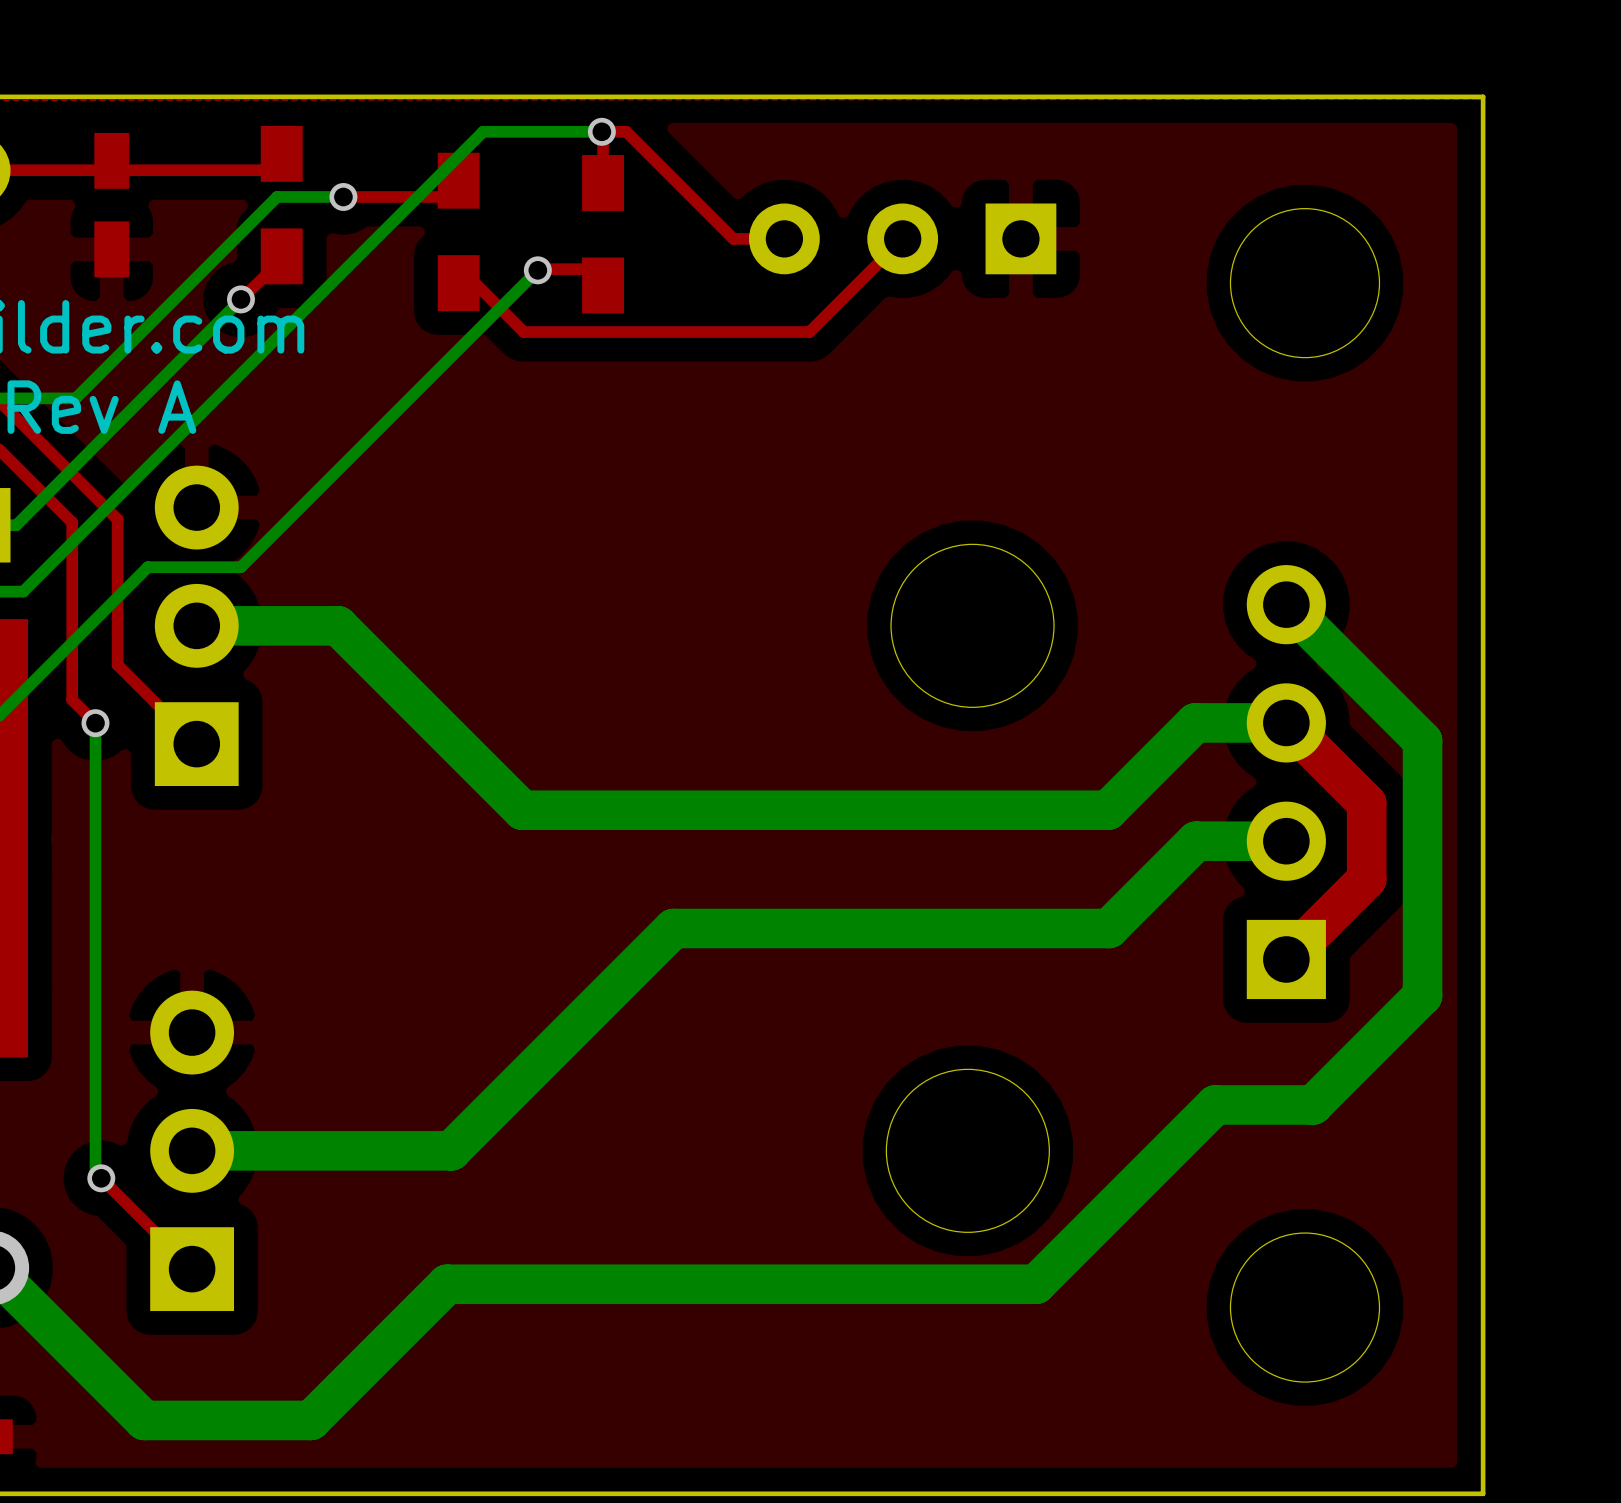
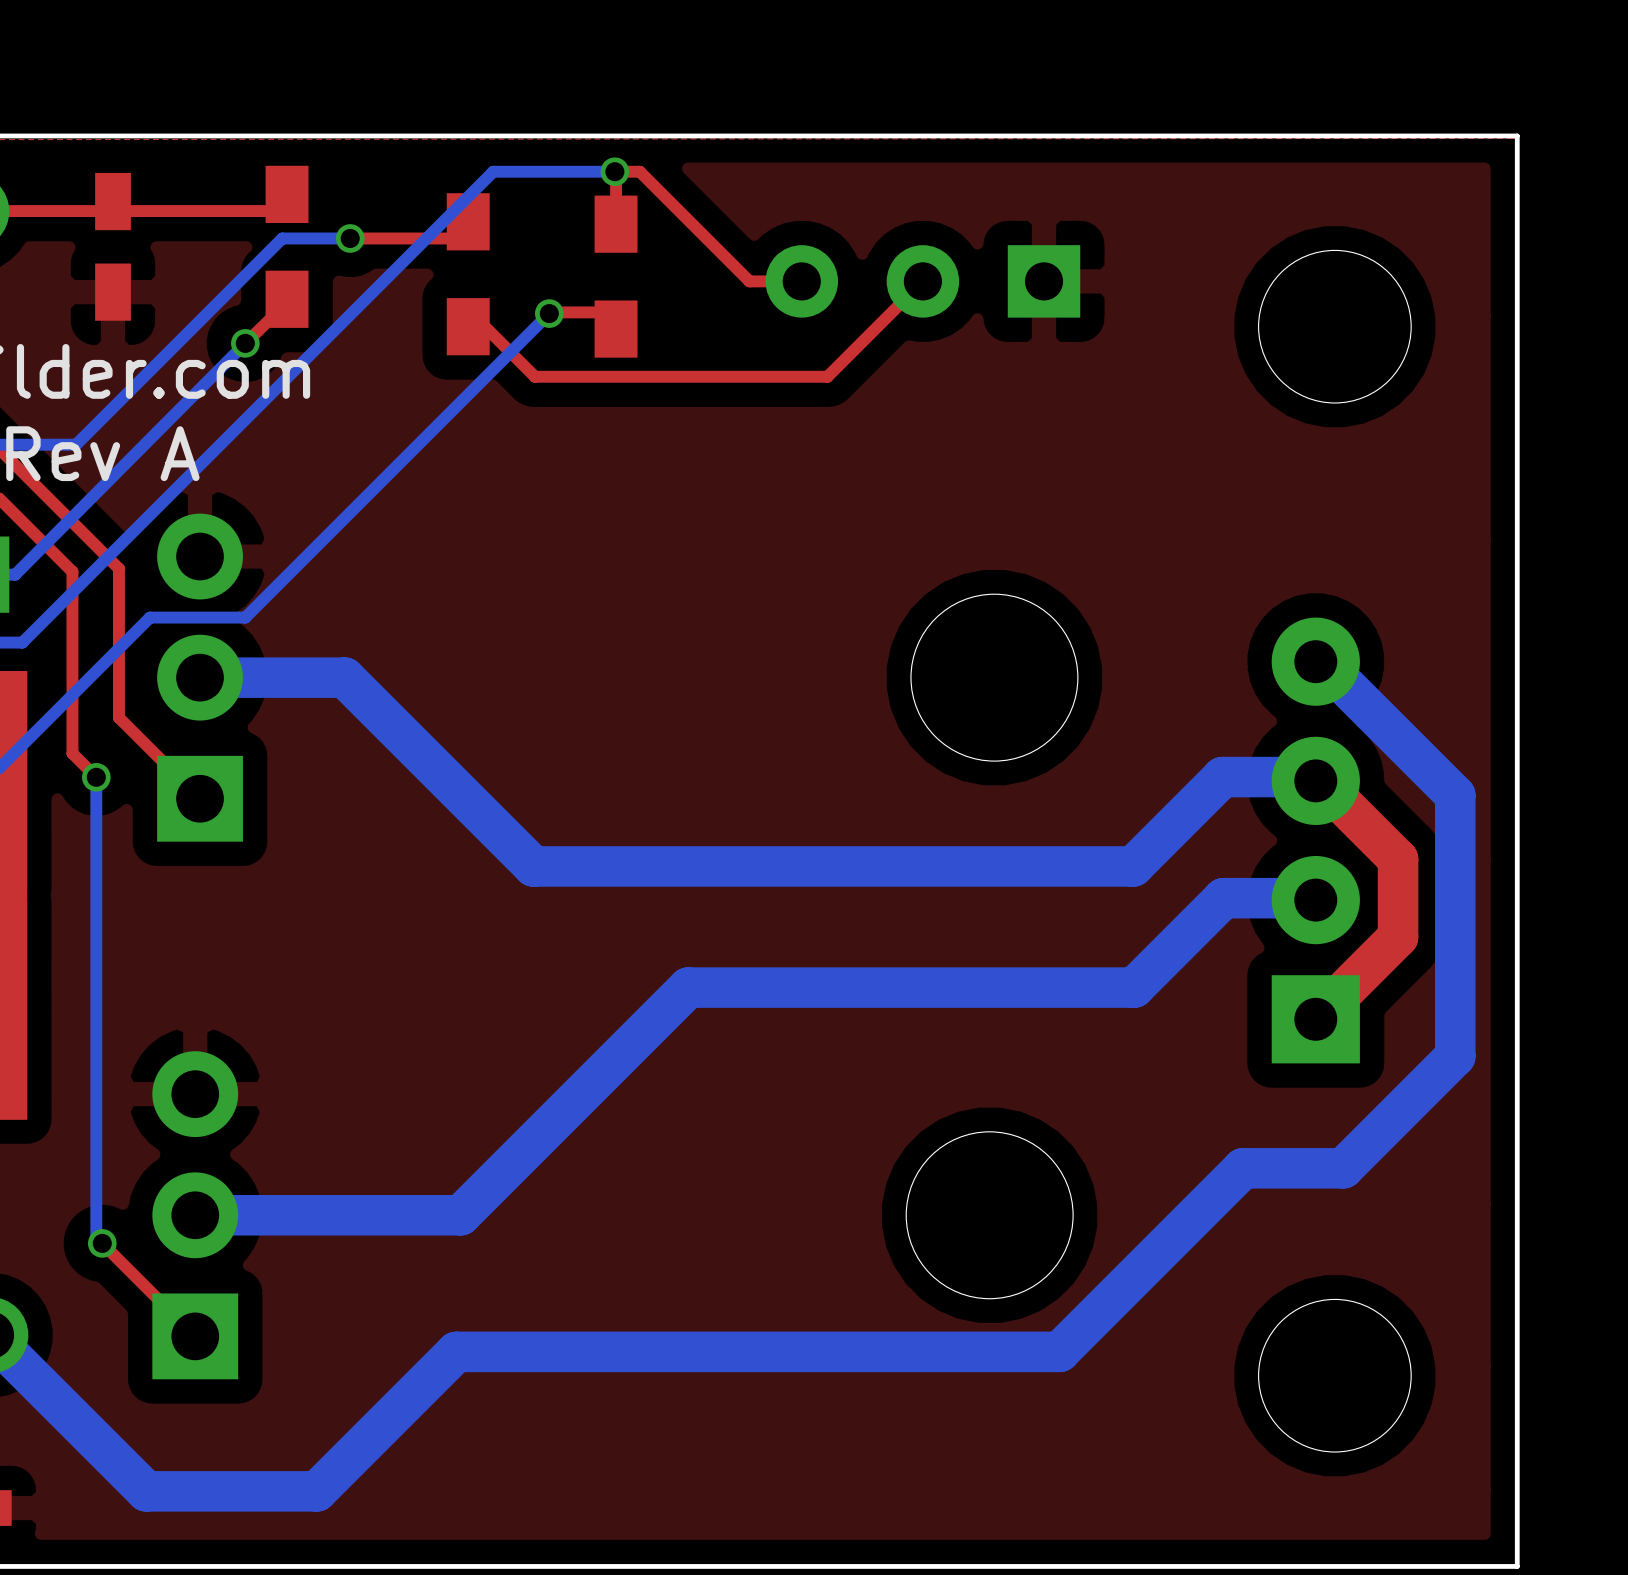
part footprint: [1246, 565, 1326, 1000] -> [1271, 617, 1360, 1064]

